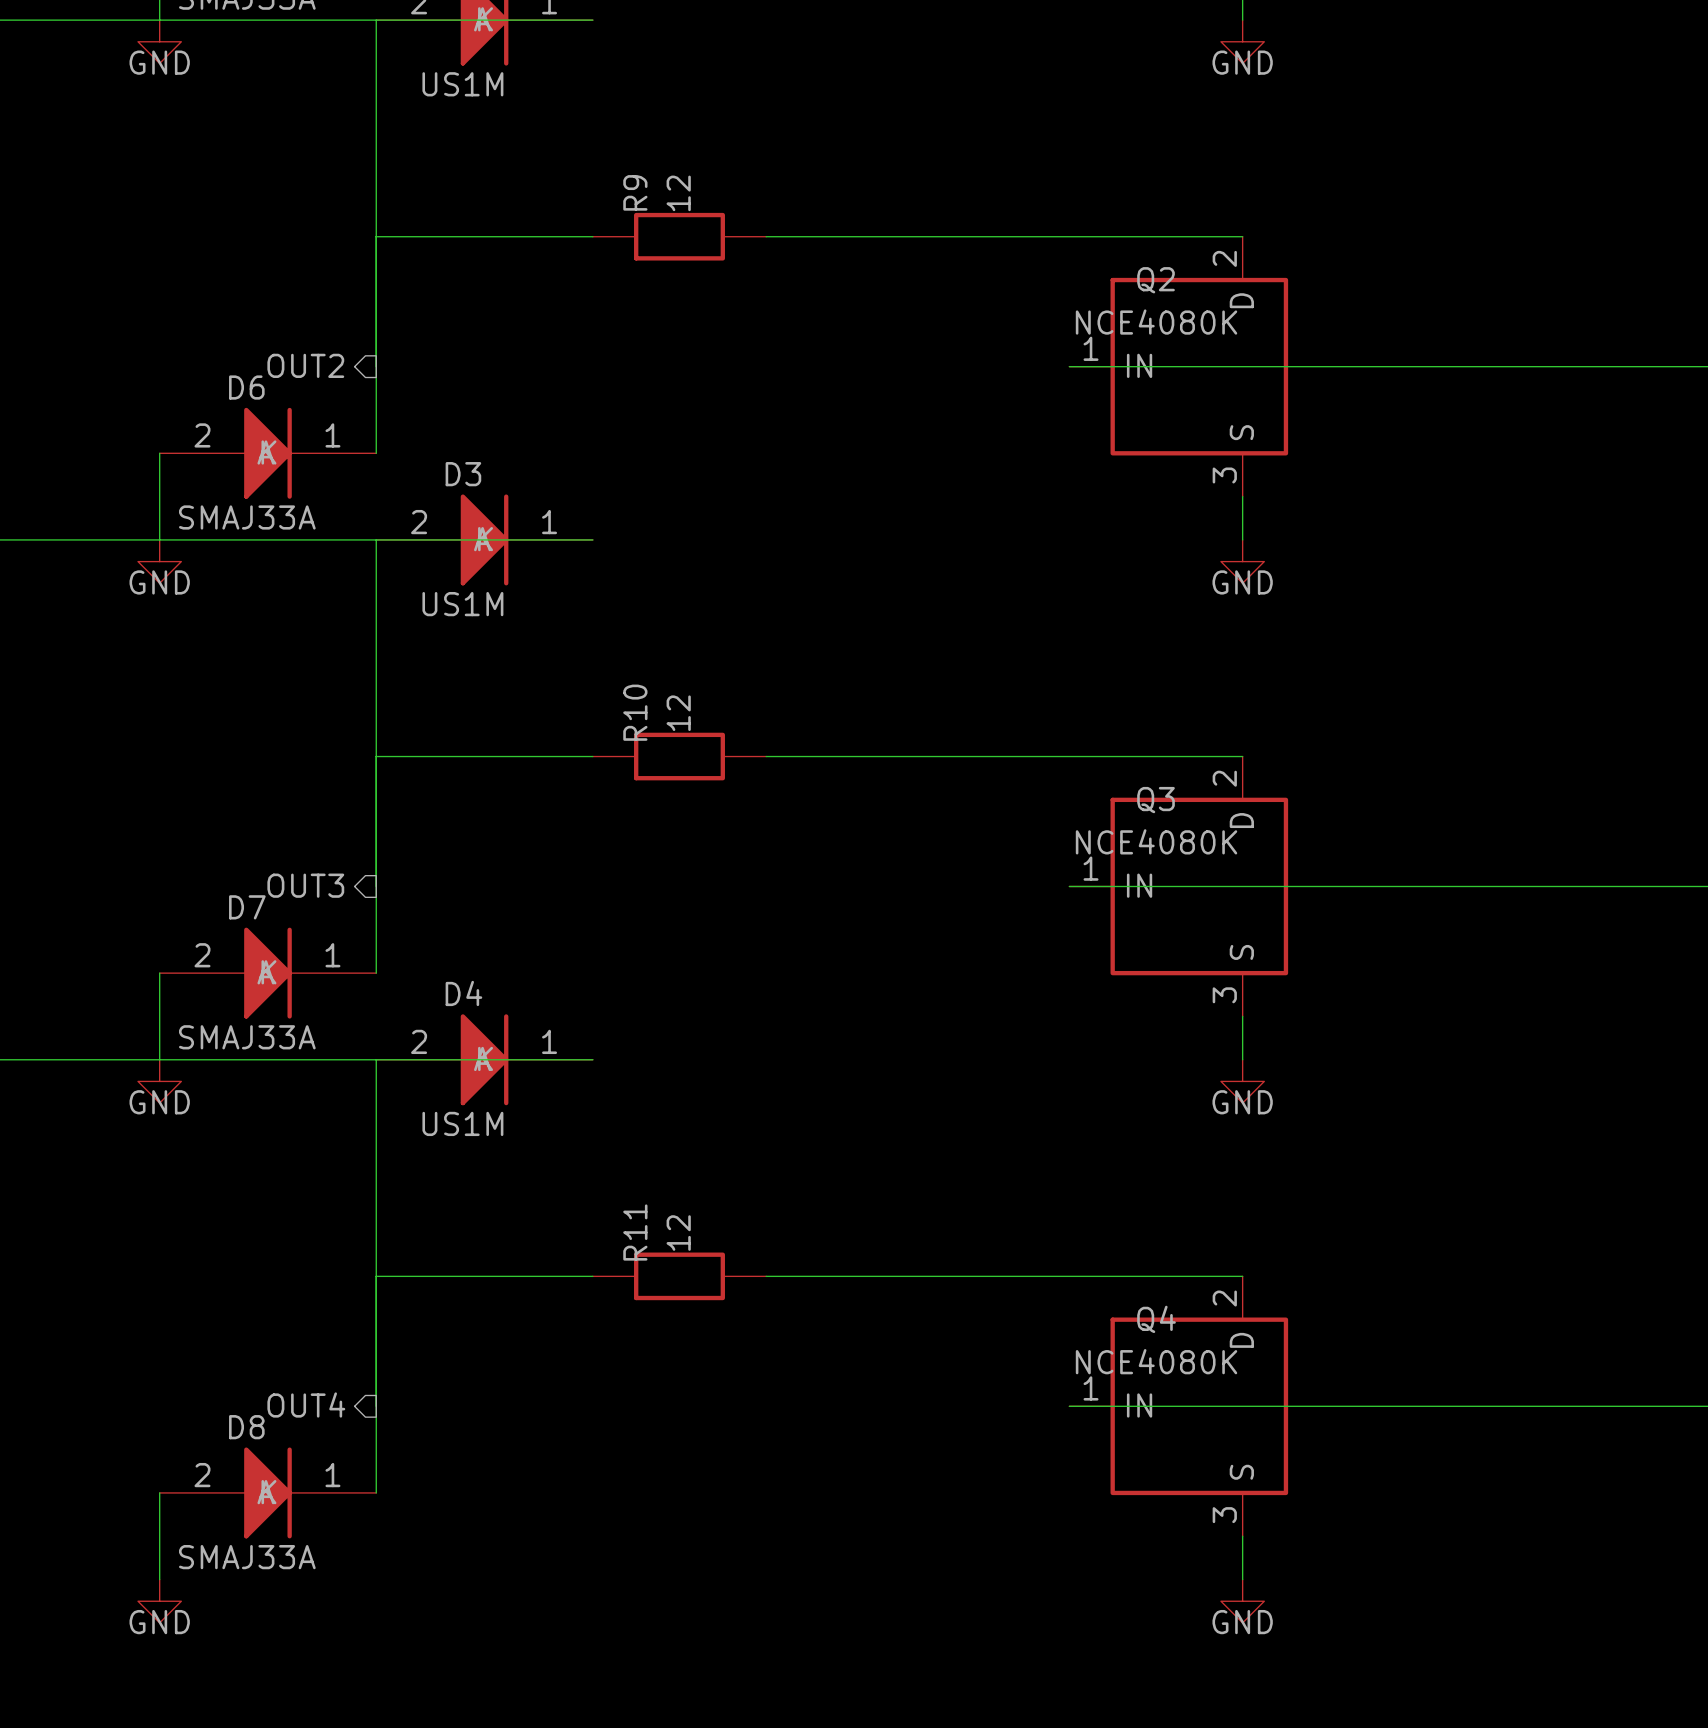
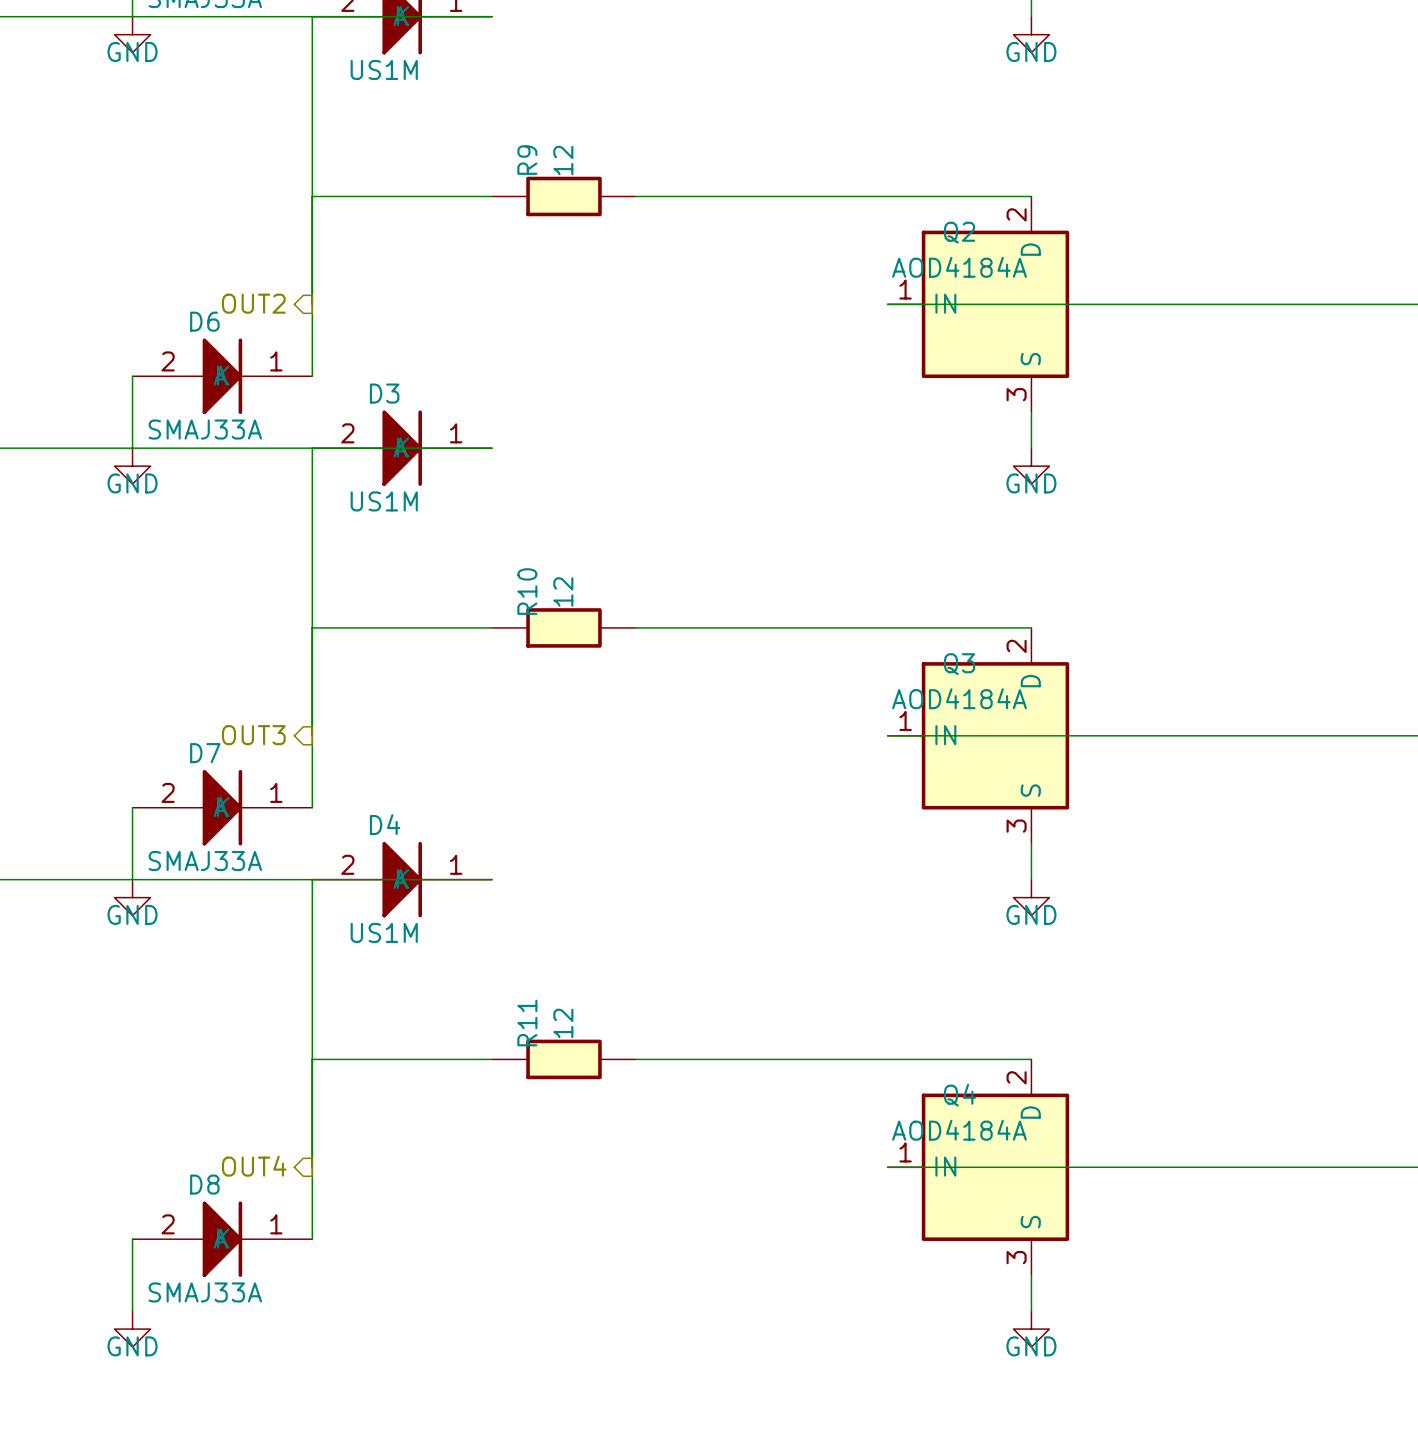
Q2 value: NCE4080K (1156, 322) -> AOD4184A (959, 267)
Q3 value: NCE4080K (1156, 841) -> AOD4184A (959, 698)
Q4 value: NCE4080K (1156, 1361) -> AOD4184A (959, 1130)

